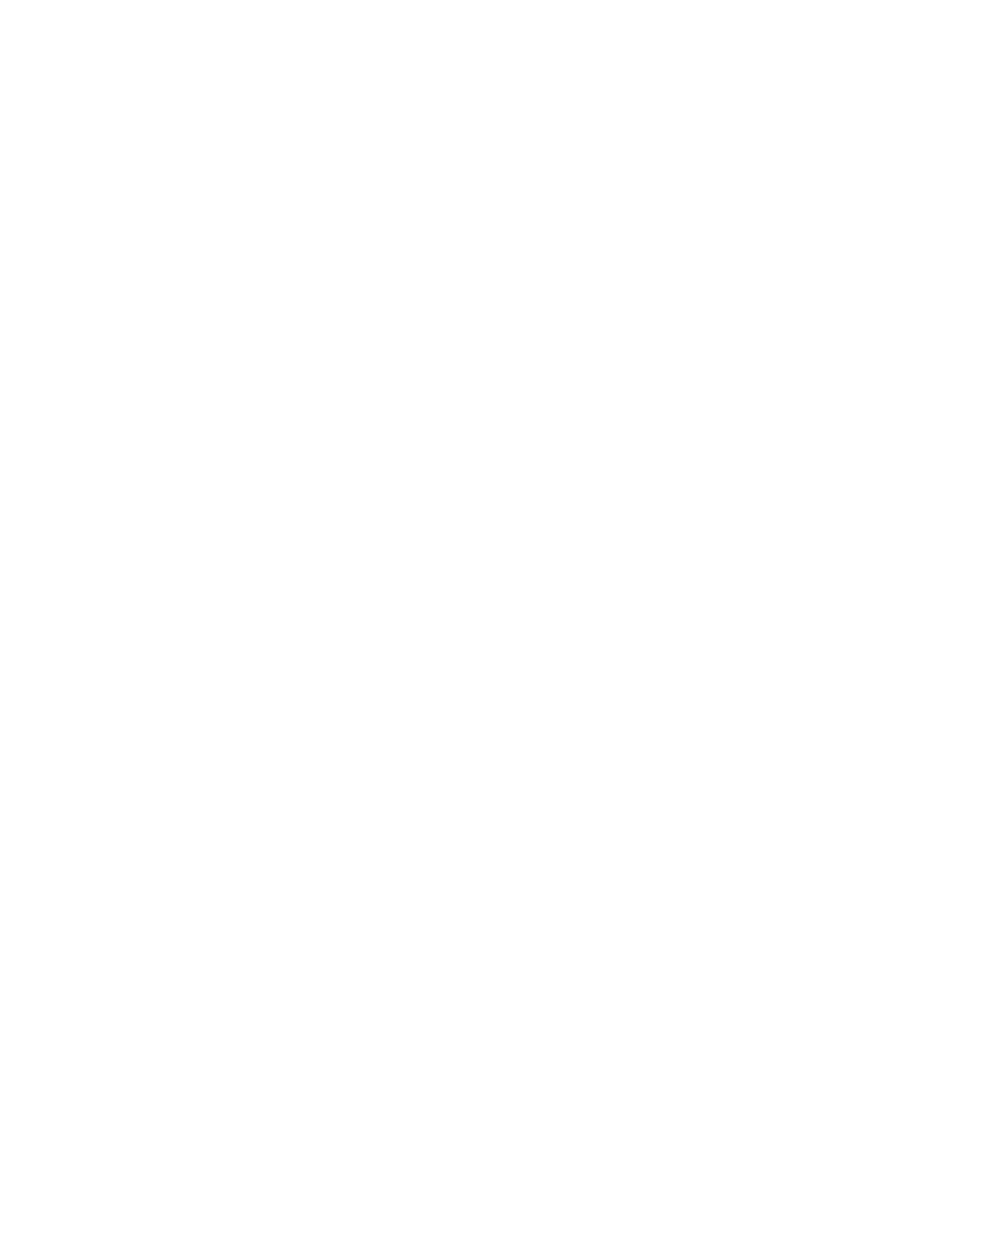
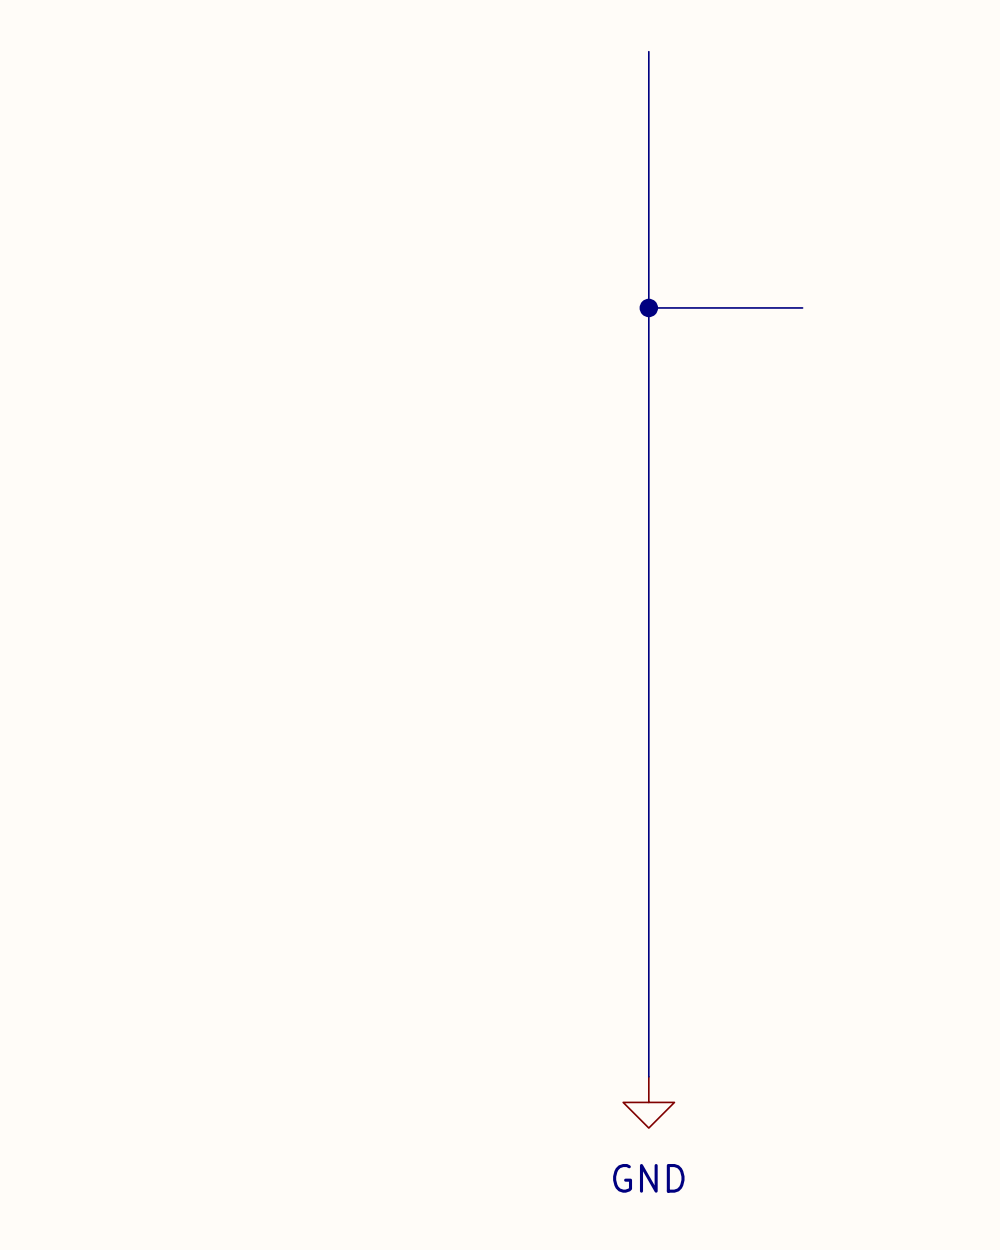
wire: none -> (648, 51) (648, 1076)
wire: none -> (648, 307) (802, 307)
junction: none -> (648, 307)
power symbol: none -> GND (648, 1102)

